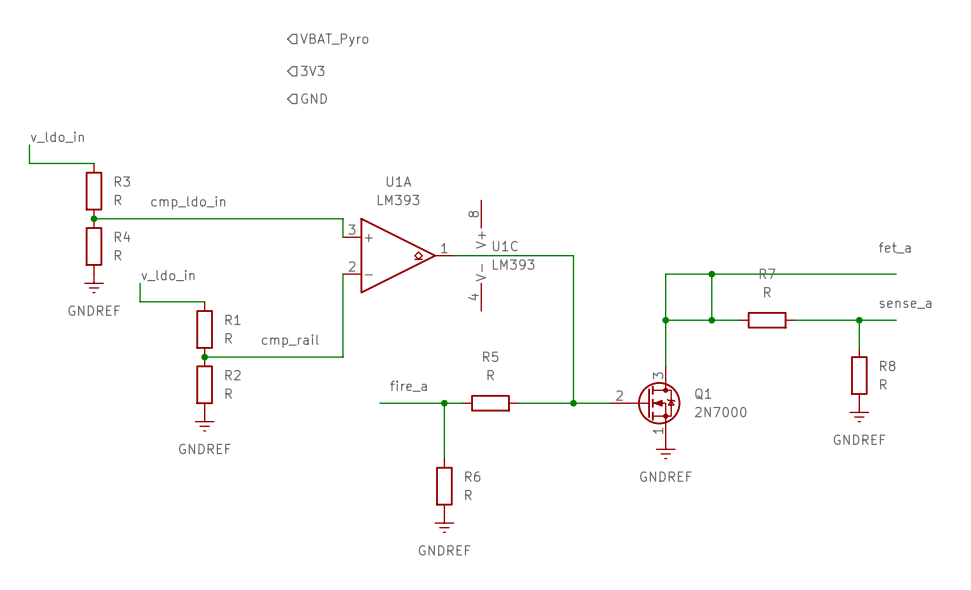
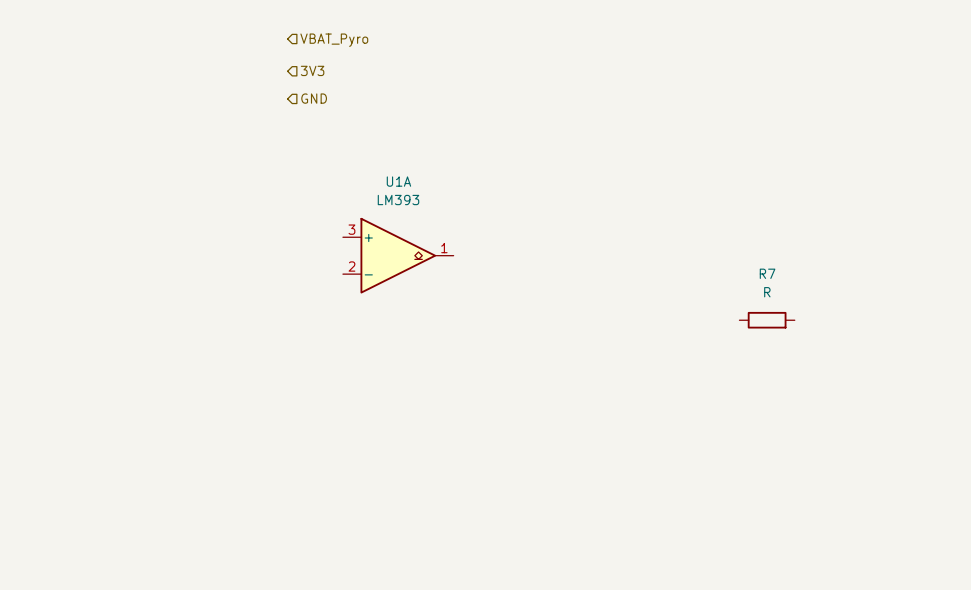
label: v_ldo_in (57, 137) -> none
wire: (29, 145) (29, 163) (94, 163) -> none
R3: R (94, 191) -> none
label: cmp_ldo_in (188, 202) -> none
wire: (94, 218) (342, 218) (342, 237) -> none
junction: (94, 218) -> none
R4: R (94, 246) -> none
label: fet_a (894, 247) -> none
wire: (453, 255) (573, 255) (573, 403) -> none
U1C: LM393 (481, 255) -> none
wire: (342, 274) (342, 357) (204, 357) -> none
wire: (711, 274) (711, 320) -> none
junction: (711, 274) -> none
wire: (896, 274) (665, 274) (665, 366) -> none
label: v_ldo_in (168, 275) -> none
power symbol: GNDREF (94, 283) -> none
wire: (140, 283) (140, 301) (204, 301) -> none
label: sense_a (905, 304) -> none
wire: (665, 320) (739, 320) -> none
junction: (665, 320) -> none
junction: (711, 320) -> none
wire: (794, 320) (896, 320) -> none
wire: (859, 320) (859, 347) -> none
junction: (859, 320) -> none
R1: R (204, 329) -> none
label: cmp_rail (290, 341) -> none
junction: (204, 357) -> none
R8: R (859, 375) -> none
R2: R (204, 384) -> none
label: fire_a (408, 386) -> none
wire: (379, 403) (462, 403) -> none
wire: (444, 403) (444, 458) -> none
junction: (444, 403) -> none
R5: R (490, 403) -> none
wire: (518, 403) (610, 403) -> none
junction: (573, 403) -> none
Q1: 2N7000 (645, 403) -> none
power symbol: GNDREF (859, 412) -> none
power symbol: GNDREF (204, 421) -> none
power symbol: GNDREF (665, 449) -> none
R6: R (444, 486) -> none
power symbol: GNDREF (444, 523) -> none

